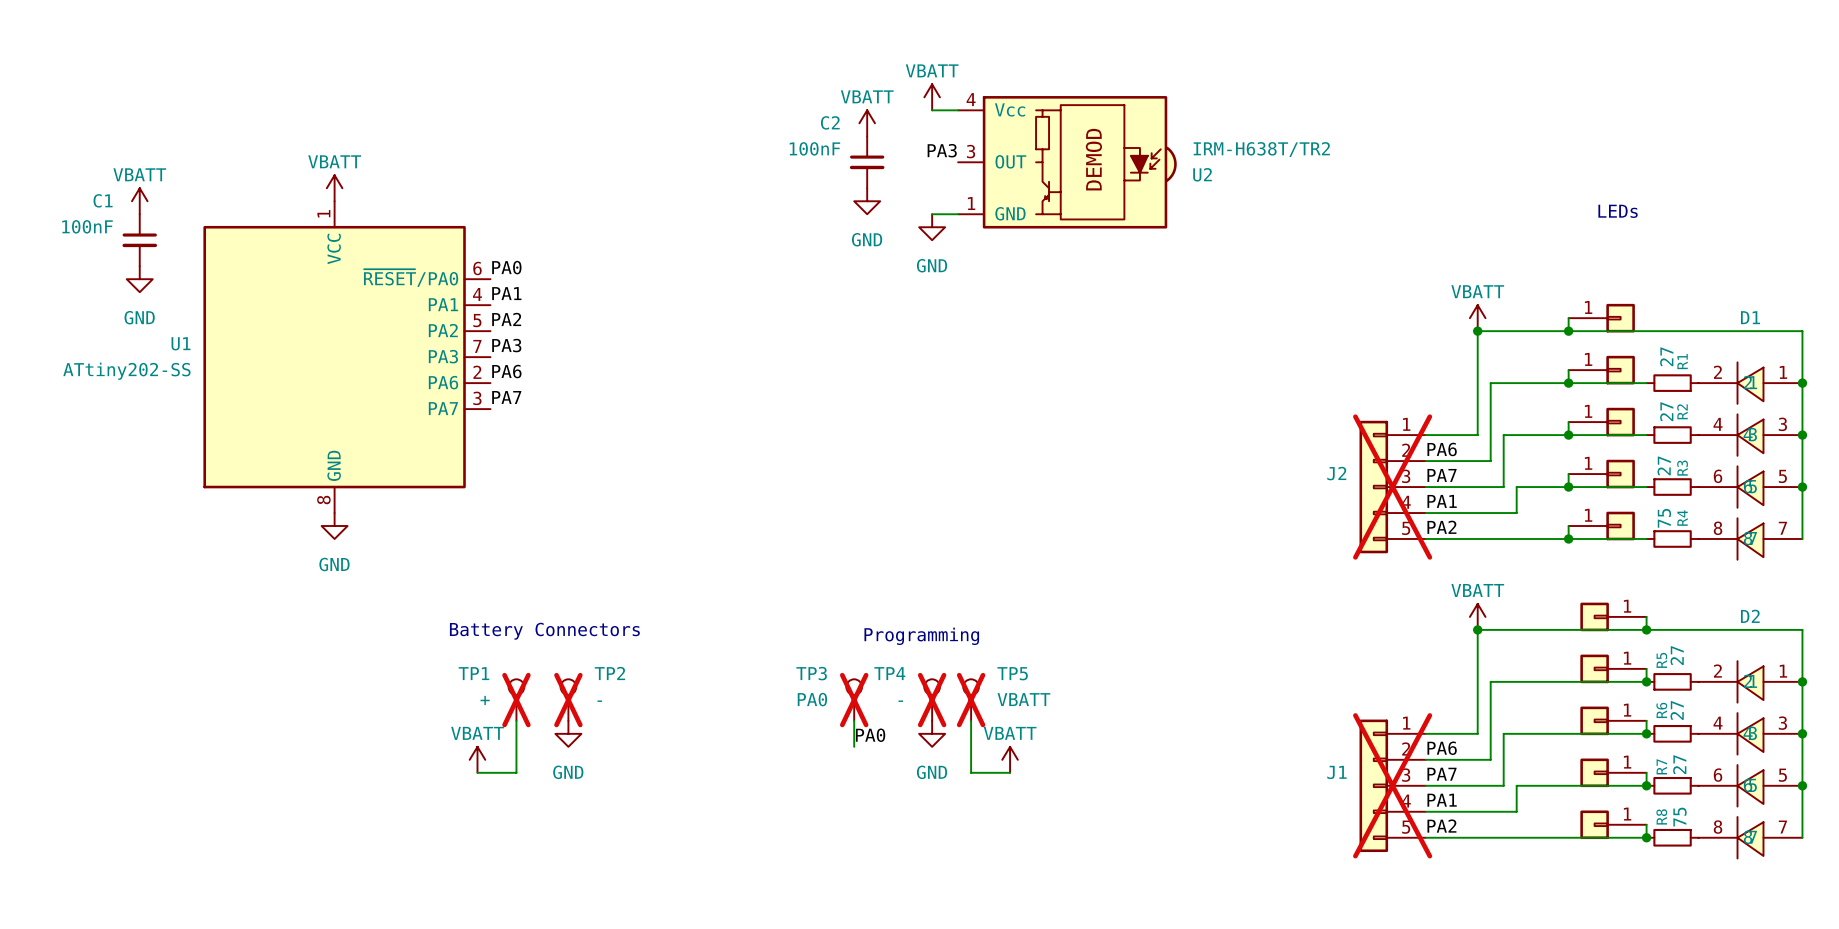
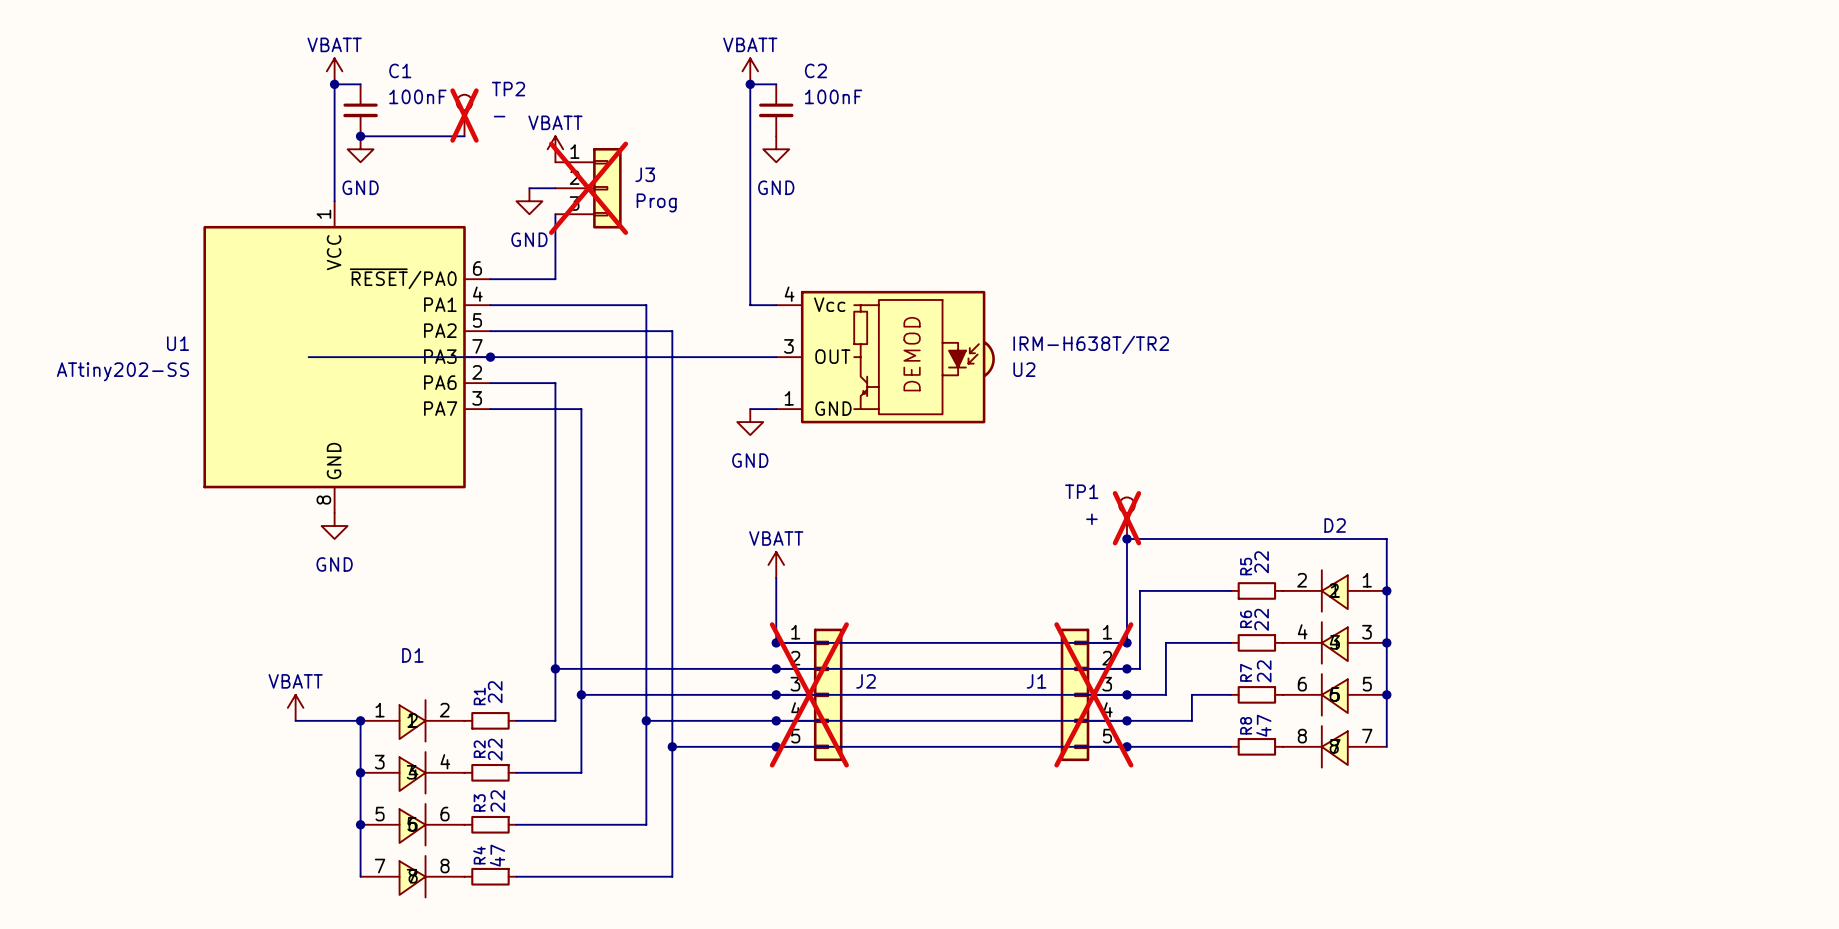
power symbol: none -> VBATT (334, 71)
power symbol: none -> VBATT (750, 71)
junction: none -> (334, 84)
wire: none -> (360, 84) (334, 84) (334, 201)
junction: none -> (750, 84)
wire: none -> (776, 84) (750, 84) (750, 305) (776, 305)
power symbol: VBATT (932, 97) -> none
wire: (932, 110) (958, 110) -> none
C2 name position: C2 (830, 122) -> C2 (815, 70)
power symbol: VBATT (867, 123) -> none
wire: none -> (360, 136) (464, 136)
junction: none -> (360, 136)
C2 value position: 100nF (814, 148) -> 100nF (833, 96)
power symbol: none -> GND (360, 149)
power symbol: none -> VBATT (555, 149)
power symbol: none -> GND (776, 149)
label: PA3 (942, 150) -> none
C2 position: (867, 162) -> (776, 110)
U2 position: (1067, 162) -> (885, 357)
power symbol: VBATT (334, 188) -> none
wire: none -> (529, 188) (555, 188)
J3: none -> Prog (588, 188)
C1 name position: C1 (103, 200) -> C1 (400, 70)
power symbol: VBATT (139, 201) -> none
power symbol: none -> GND (529, 201)
power symbol: GND (867, 201) -> none
text: LEDs (1618, 211) -> none
wire: none -> (555, 214) (555, 279) (490, 279)
wire: (932, 214) (958, 214) -> none
C1 value position: 100nF (87, 226) -> 100nF (417, 96)
power symbol: GND (932, 227) -> none
C1 position: (139, 240) -> (360, 110)
label: PA0 (506, 267) -> none
power symbol: GND (139, 279) -> none
label: PA1 (506, 293) -> none
wire: none -> (490, 305) (646, 305) (646, 824) (516, 824)
power symbol: VBATT (1477, 318) -> none
wire: (1568, 318) (1568, 331) -> none
part: (1601, 318) -> none
label: PA2 (506, 319) -> none
wire: none -> (490, 331) (672, 331) (672, 876) (516, 876)
junction: (1477, 331) -> none
junction: (1568, 331) -> none
label: PA3 (506, 345) -> none
R1 value: 27 (1666, 356) -> 22 (495, 692)
wire: none -> (308, 357) (776, 357)
junction: none -> (490, 357)
R1 name position: R1 (1682, 361) -> R1 (479, 696)
wire: (1568, 370) (1568, 383) -> none
part: (1601, 370) -> none
label: PA6 (506, 371) -> none
junction: (1568, 383) -> none
wire: (1646, 383) (1490, 383) (1490, 461) (1425, 461) -> none
R1 position: (1672, 383) -> (490, 720)
junction: (1802, 383) -> none
label: PA7 (506, 397) -> none
wire: none -> (490, 409) (581, 409) (581, 772) (516, 772)
wire: none -> (750, 409) (776, 409)
R2 value: 27 (1666, 411) -> 22 (495, 749)
R2 name position: R2 (1682, 411) -> R2 (479, 749)
power symbol: none -> GND (750, 422)
wire: (1568, 422) (1568, 435) -> none
part: (1601, 422) -> none
wire: (1425, 435) (1477, 435) (1477, 331) (1802, 331) (1802, 538) -> none
junction: (1568, 435) -> none
wire: (1646, 435) (1503, 435) (1503, 487) (1425, 487) -> none
R2 position: (1672, 435) -> (490, 772)
junction: (1802, 435) -> none
label: PA6 (1442, 449) -> none
D1 flip: as is (1750, 461) -> left-right (412, 798)
D1 position: (1750, 461) -> (412, 798)
R3 value: 27 (1664, 465) -> 22 (497, 801)
R3 name position: R3 (1682, 468) -> R3 (479, 802)
wire: (1568, 474) (1568, 487) -> none
part: (1601, 474) -> none
label: PA7 (1442, 475) -> none
J2 flip: as is (1373, 487) -> left-right (828, 694)
J2 position: (1392, 487) -> (809, 694)
junction: (1568, 487) -> none
wire: (1646, 487) (1516, 487) (1516, 513) (1425, 513) -> none
R3 position: (1672, 487) -> (490, 824)
junction: (1802, 487) -> none
label: PA1 (1442, 501) -> none
R4 value: 75 (1664, 518) -> 47 (497, 855)
R4 name position: R4 (1682, 518) -> R4 (479, 855)
wire: (1568, 526) (1568, 538) -> none
part: (1601, 526) -> none
label: PA2 (1441, 527) -> none
junction: none -> (1126, 538)
wire: (1425, 538) (1646, 538) -> none
junction: (1568, 538) -> none
R4 position: (1672, 538) -> (490, 876)
power symbol: none -> VBATT (776, 564)
wire: none -> (776, 577) (776, 642) (1126, 642) (1126, 538) (1386, 538) (1386, 746)
wire: none -> (1230, 590) (1139, 590) (1139, 668) (555, 668)
junction: none -> (1386, 590)
power symbol: VBATT (1477, 616) -> none
part: (1613, 616) -> none
wire: (1646, 616) (1646, 629) -> none
junction: (1477, 629) -> none
junction: (1646, 629) -> none
text: Battery Connectors (544, 631) -> none
text: Programming (921, 636) -> none
junction: none -> (776, 642)
junction: none -> (1126, 642)
wire: none -> (1230, 642) (1165, 642) (1165, 694) (581, 694)
junction: none -> (1386, 642)
R5 value: 27 (1677, 655) -> 22 (1261, 562)
junction: none -> (555, 668)
junction: none -> (776, 668)
junction: none -> (1126, 668)
part: (1613, 668) -> none
wire: (1646, 668) (1646, 681) (1490, 681) (1490, 759) (1425, 759) -> none
junction: (1646, 681) -> none
R5 position: (1672, 681) -> (1256, 590)
junction: (1802, 681) -> none
junction: none -> (581, 694)
junction: none -> (776, 694)
junction: none -> (1126, 694)
wire: none -> (1230, 694) (1191, 694) (1191, 720) (646, 720)
junction: none -> (1386, 694)
TP1 position: (516, 700) -> (1126, 518)
TP2 position: (568, 700) -> (464, 115)
TP3: PA0 (854, 700) -> none
TP4: - (932, 700) -> none
TP5: VBATT (971, 700) -> none
power symbol: none -> VBATT (295, 707)
R6 value: 27 (1677, 710) -> 22 (1261, 619)
wire: none -> (295, 720) (360, 720) (360, 876)
junction: none -> (360, 720)
wire: (516, 720) (516, 772) (477, 772) -> (516, 720) (555, 720) (555, 383) (490, 383)
junction: none -> (646, 720)
junction: none -> (776, 720)
wire: (854, 720) (854, 746) -> none
wire: (971, 720) (971, 772) (1010, 772) -> none
junction: none -> (1126, 720)
part: (1613, 720) -> none
wire: (1646, 720) (1646, 733) (1503, 733) (1503, 785) (1425, 785) -> none
power symbol: GND (568, 733) -> none
power symbol: GND (932, 733) -> none
wire: (1425, 733) (1477, 733) (1477, 629) (1802, 629) (1802, 837) -> none
junction: (1646, 733) -> none
R6 position: (1672, 733) -> (1256, 642)
junction: (1802, 733) -> none
label: PA0 (870, 735) -> none
wire: none -> (672, 746) (1230, 746)
junction: none -> (672, 746)
junction: none -> (776, 746)
junction: none -> (1126, 746)
label: PA6 (1442, 748) -> none
power symbol: VBATT (477, 759) -> none
power symbol: VBATT (1010, 759) -> none
D2 position: (1750, 759) -> (1334, 668)
R7 value: 27 (1679, 764) -> 22 (1264, 671)
junction: none -> (360, 772)
part: (1613, 772) -> none
wire: (1646, 772) (1646, 785) (1516, 785) (1516, 811) (1425, 811) -> none
label: PA7 (1442, 774) -> none
J1 position: (1392, 785) -> (1093, 694)
junction: (1646, 785) -> none
R7 position: (1672, 785) -> (1256, 694)
junction: (1802, 785) -> none
label: PA1 (1442, 800) -> none
R8 value: 75 (1679, 817) -> 47 (1263, 725)
junction: none -> (360, 824)
part: (1613, 824) -> none
wire: (1646, 824) (1646, 837) (1425, 837) -> none
label: PA2 (1441, 826) -> none
junction: (1646, 837) -> none
R8 position: (1672, 837) -> (1256, 746)

